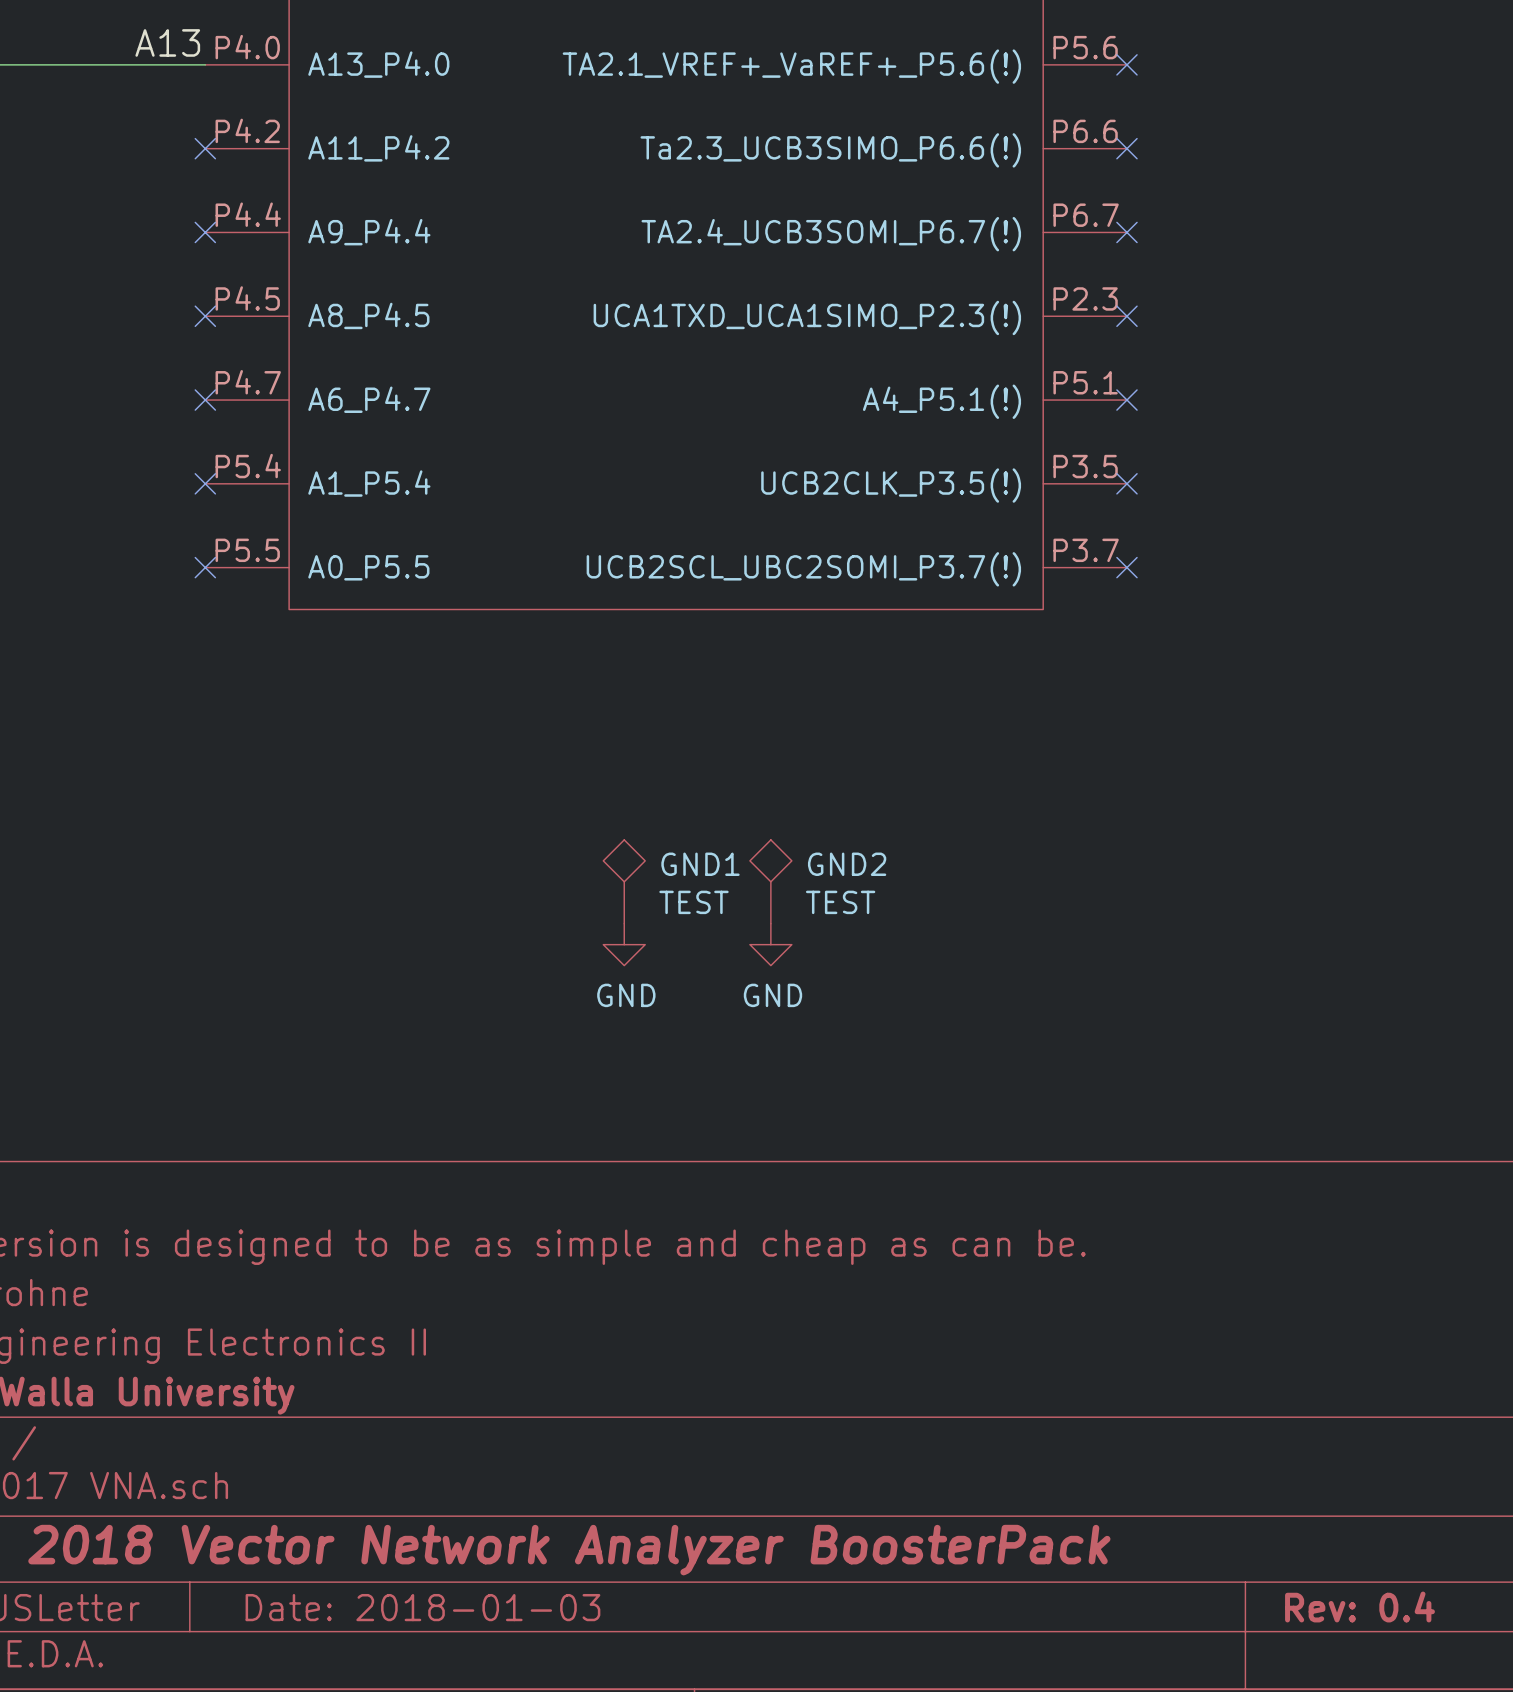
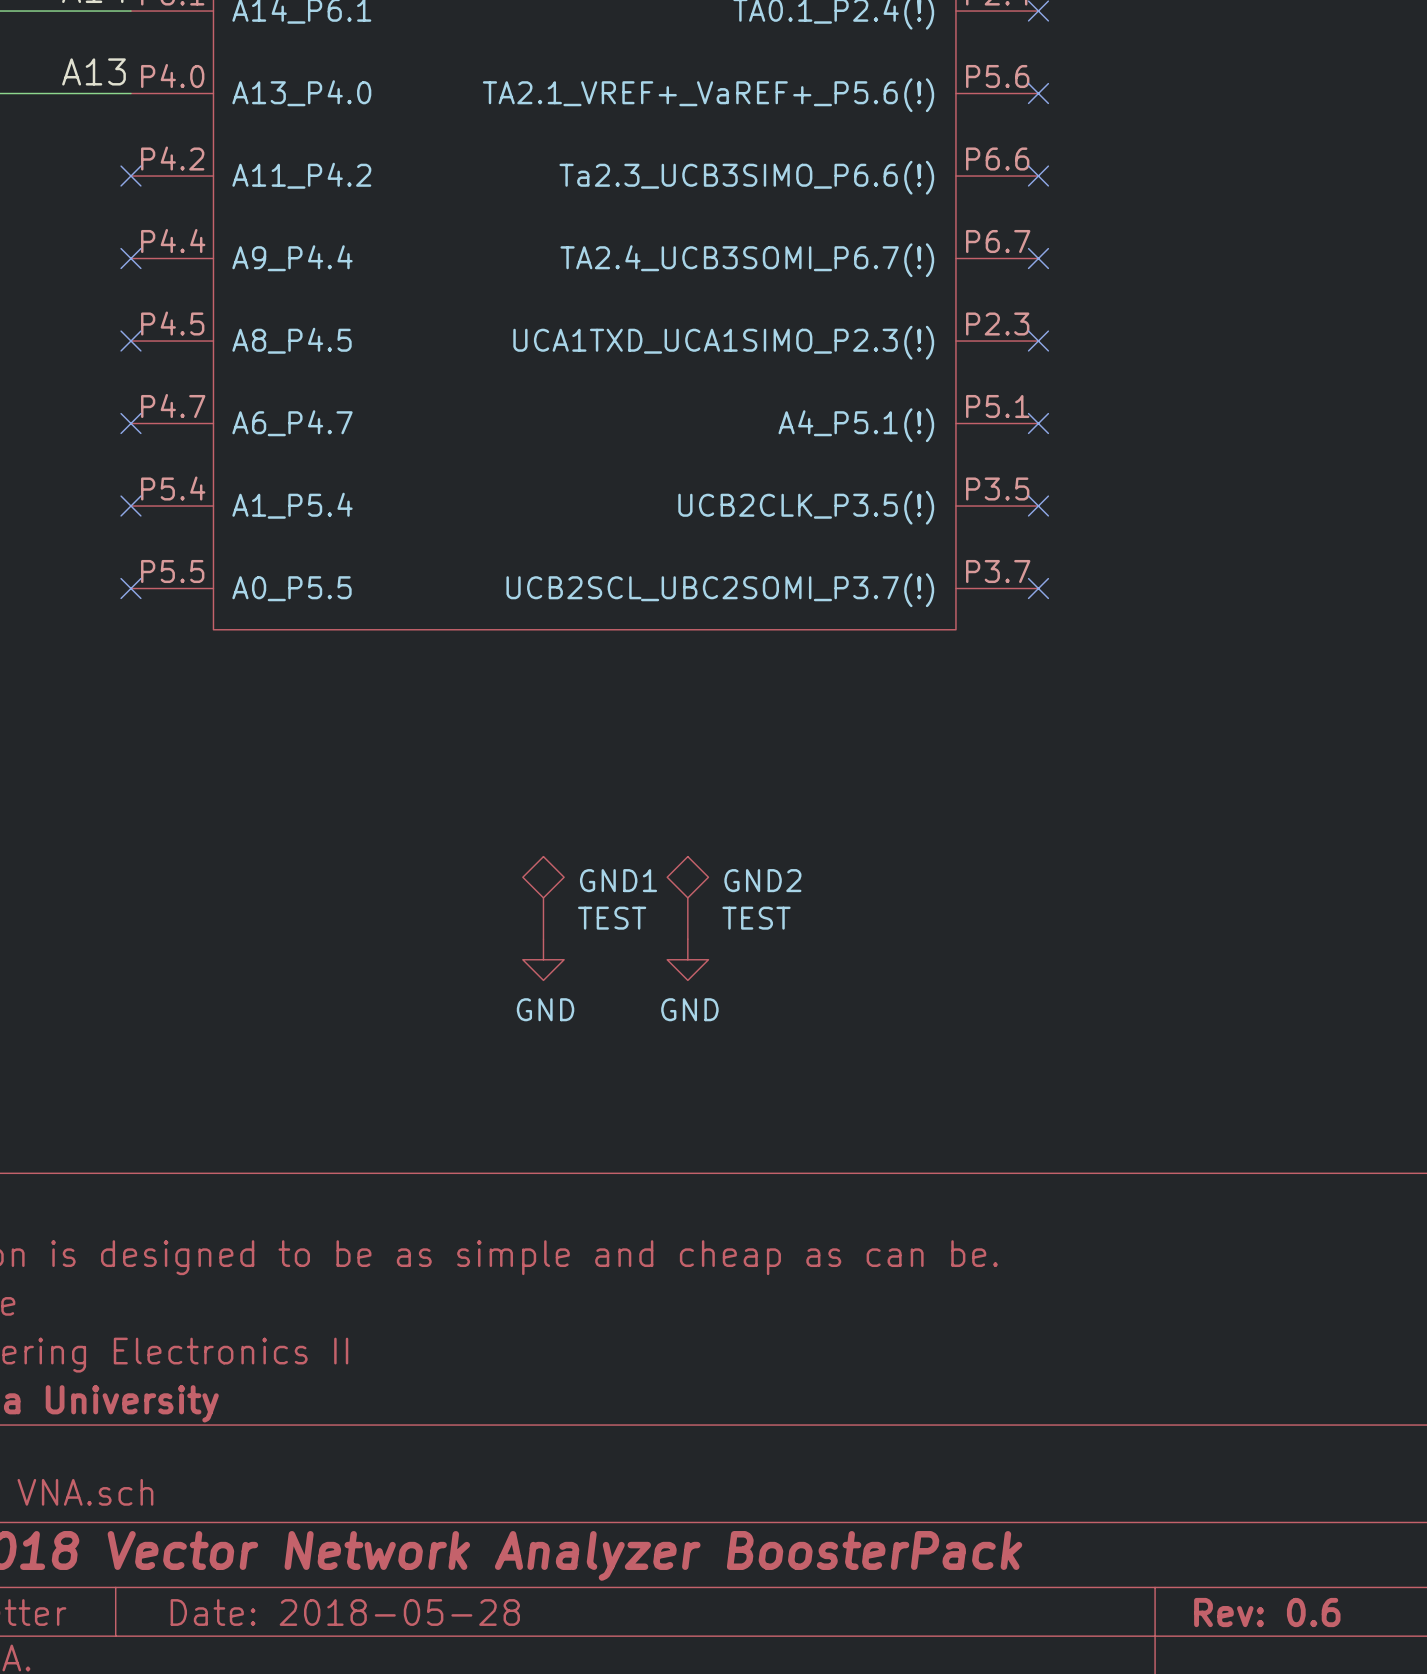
title block: Date: 2018-01-03 (422, 1607) -> Date: 2018-05-28 (345, 1612)
title block: Rev: 0.4 (1359, 1607) -> Rev: 0.6 (1267, 1612)

